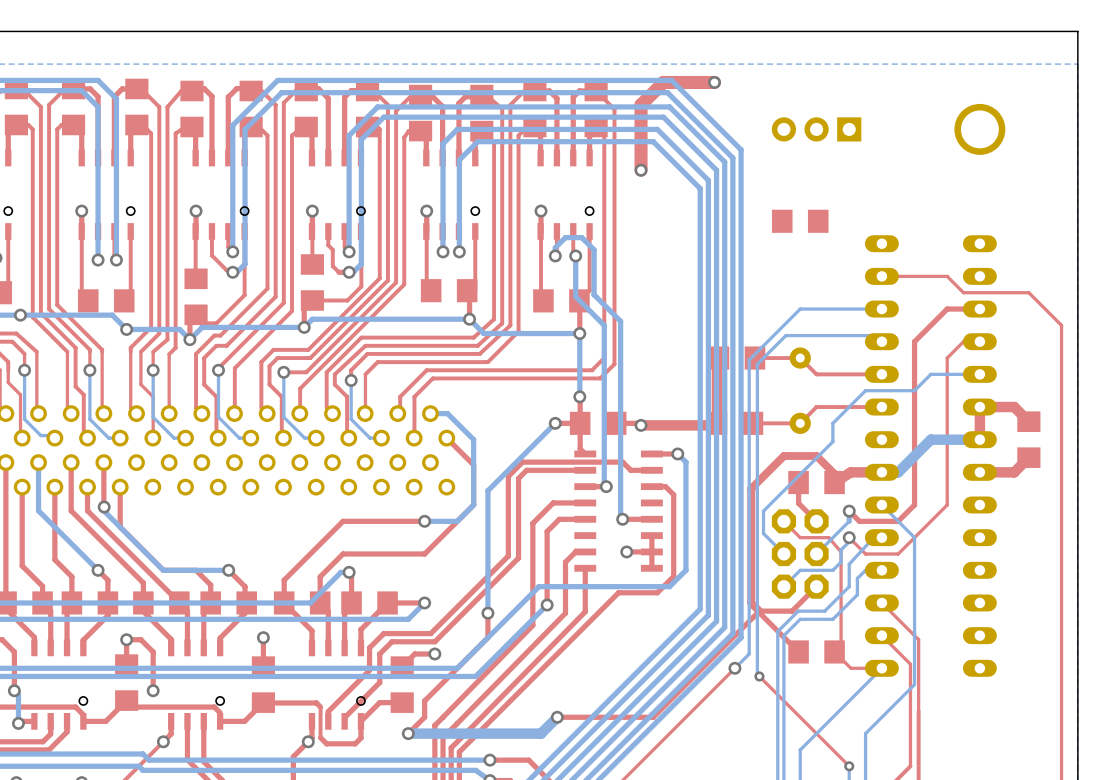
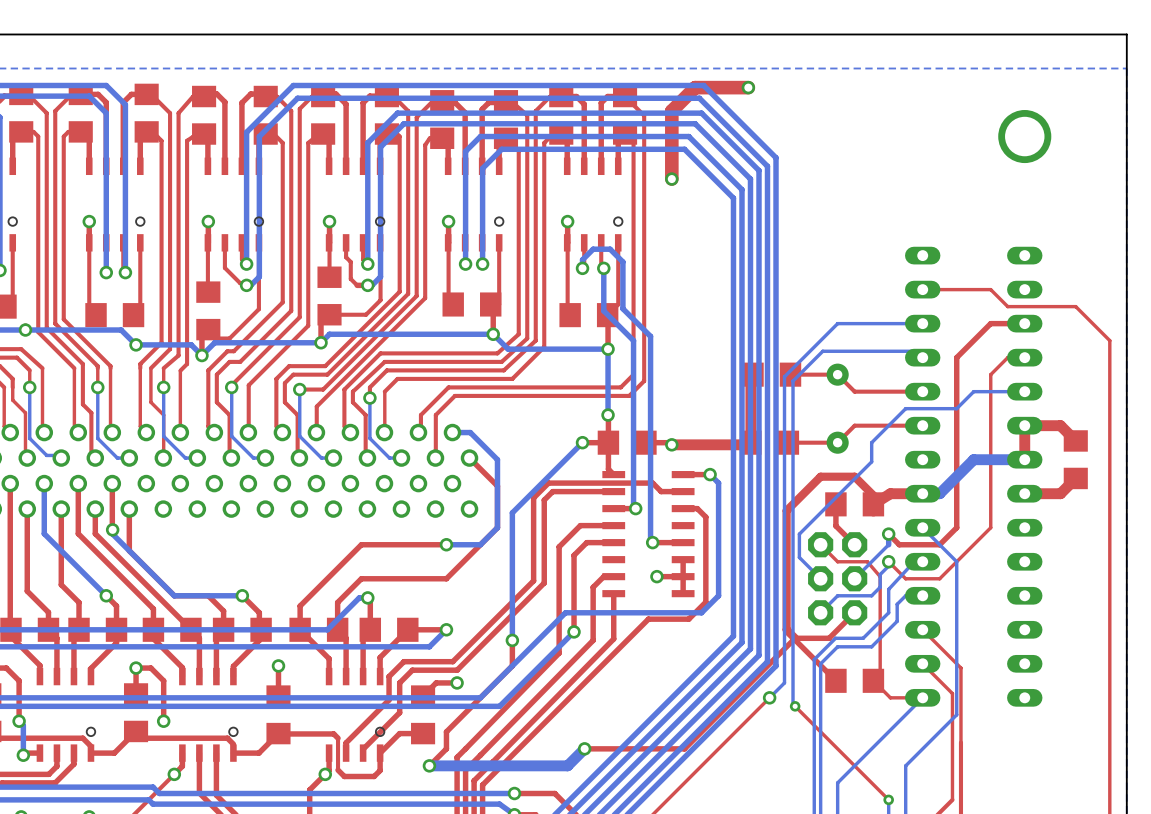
part: (816, 129) -> none
part: (800, 221) -> none

